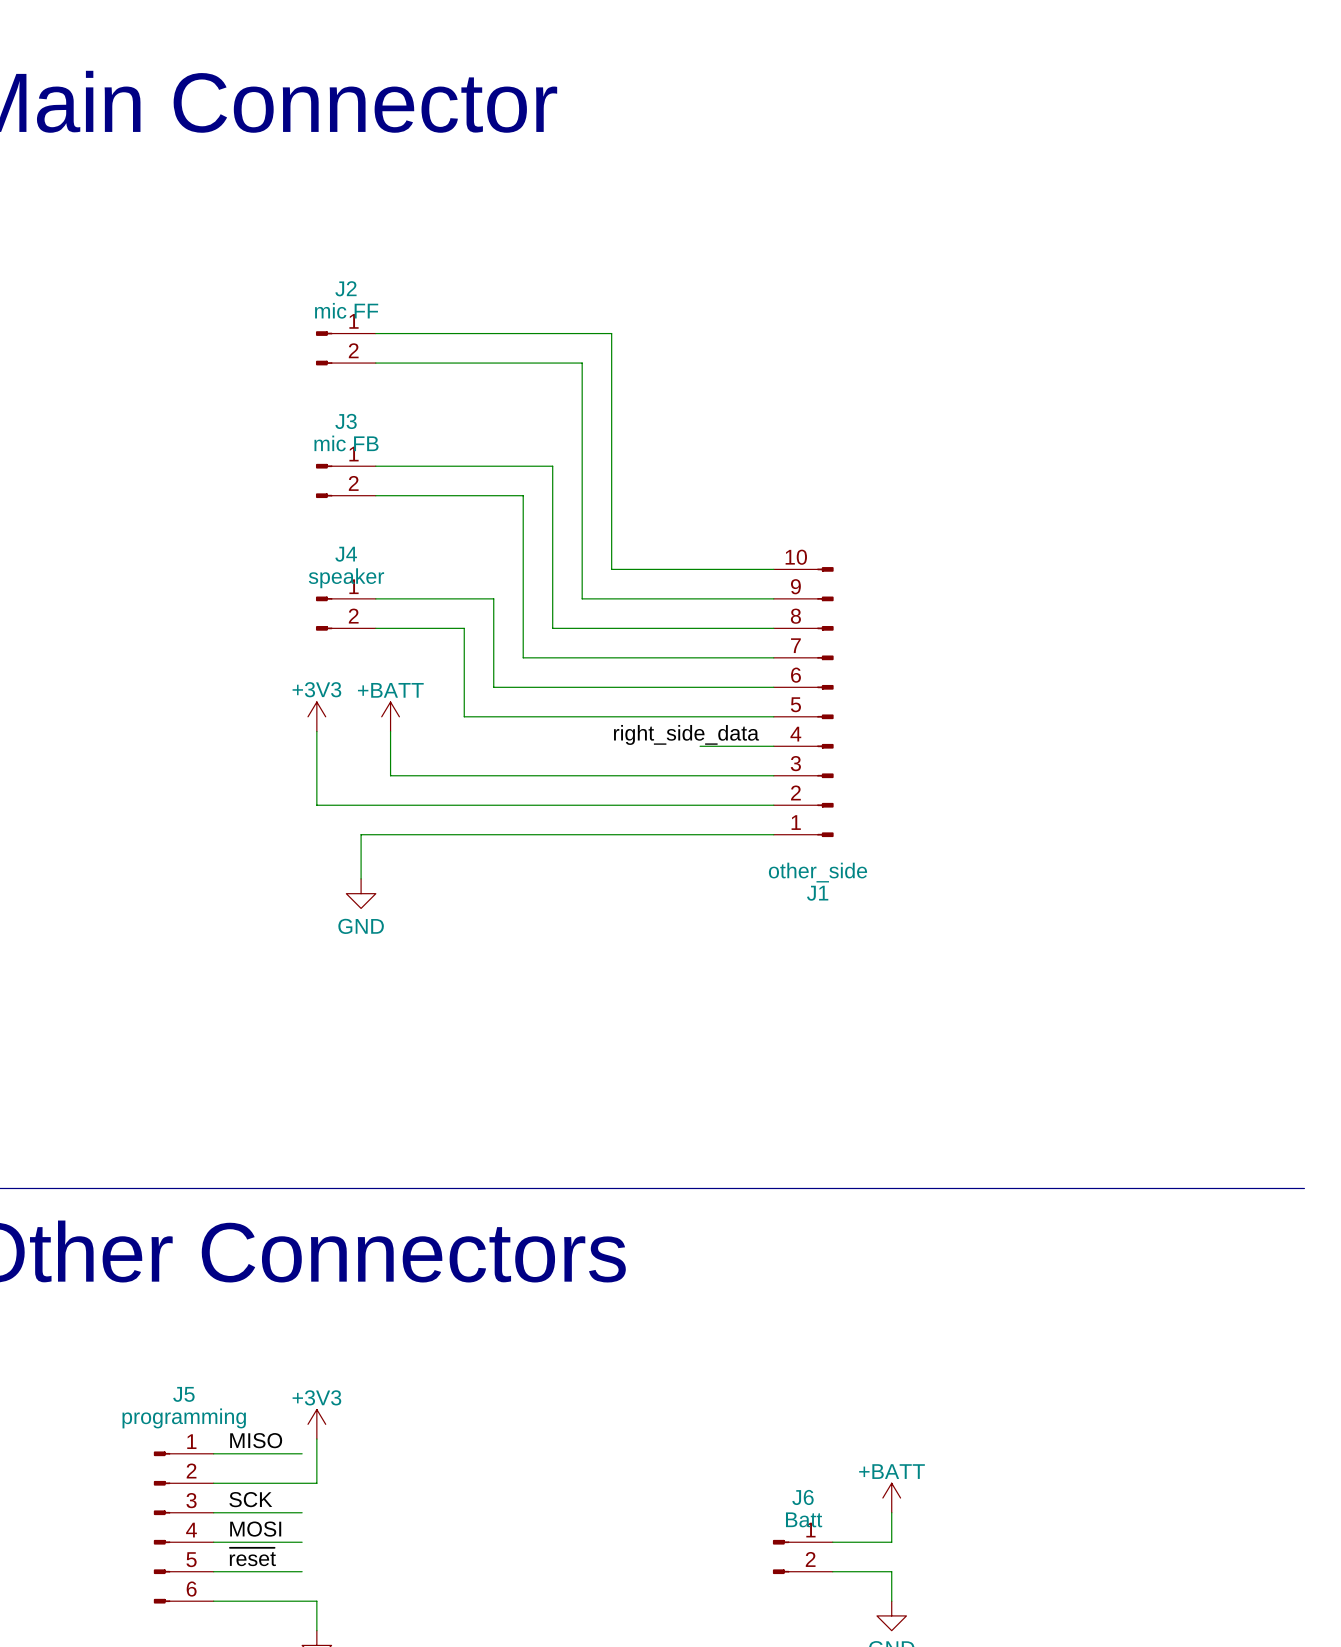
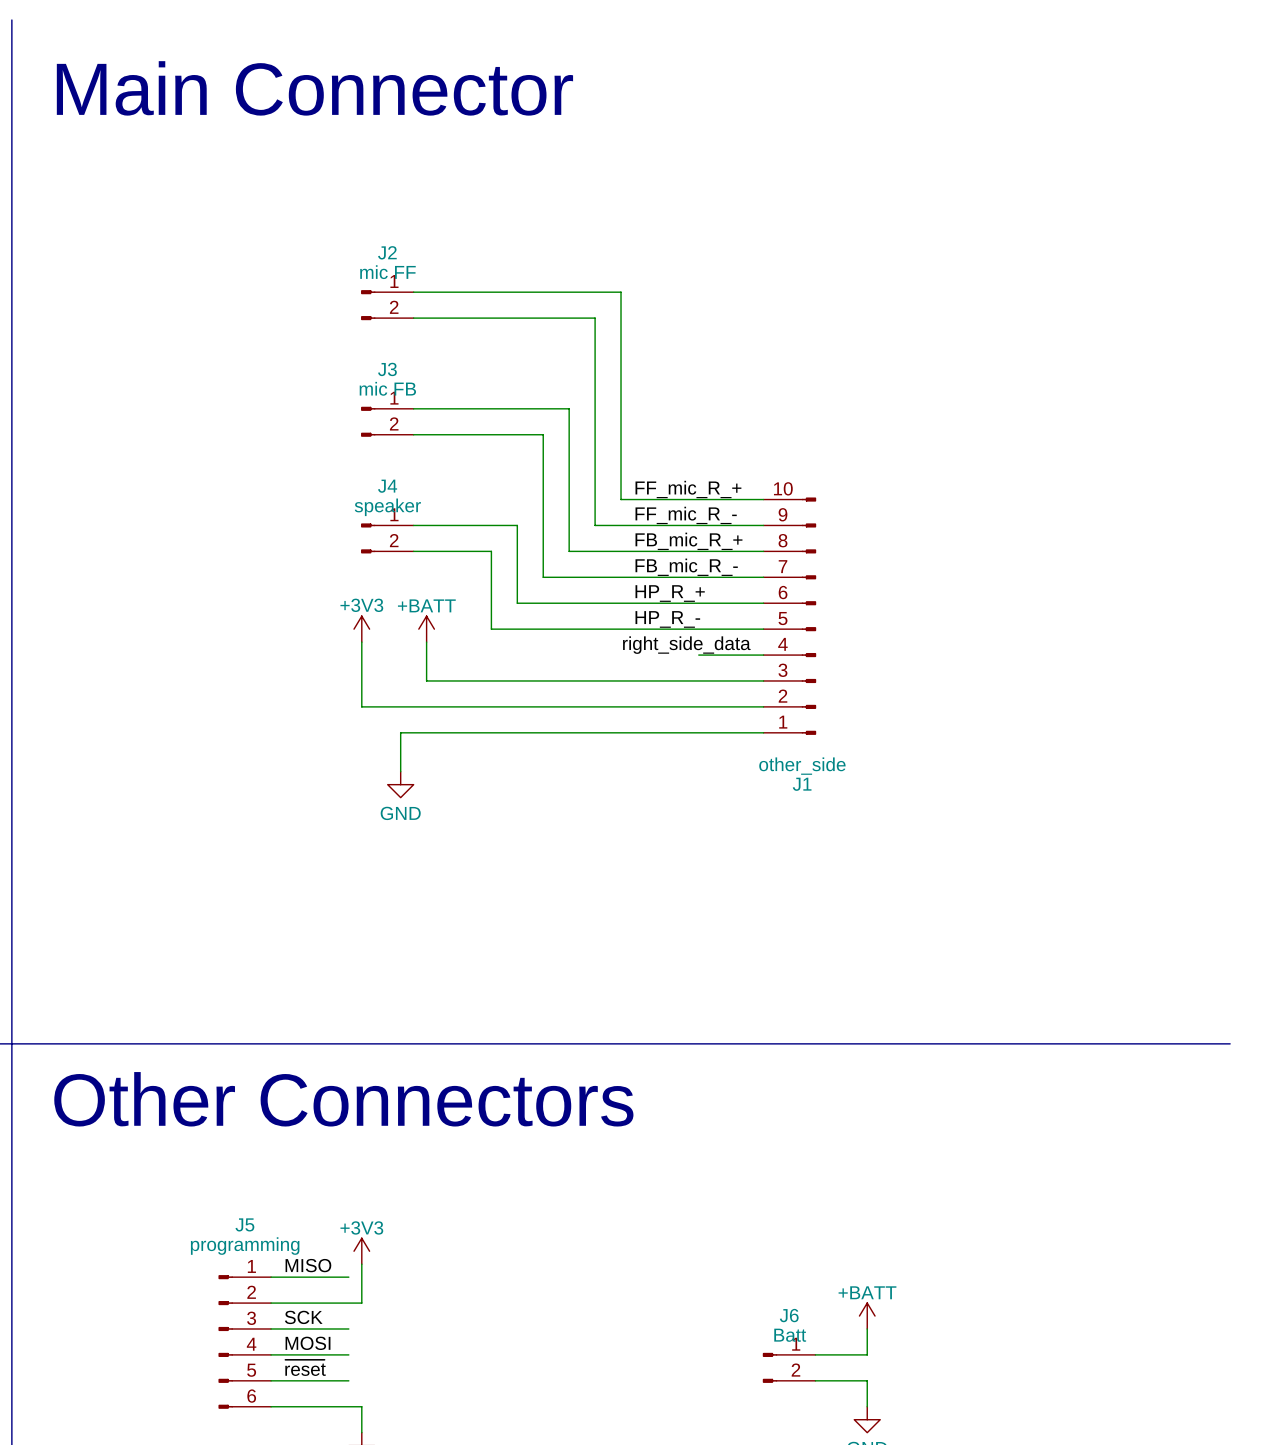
label: none -> FF_mic_R_+ (688, 489)
label: none -> FF_mic_R_- (686, 515)
label: none -> FB_mic_R_+ (688, 541)
label: none -> FB_mic_R_- (686, 567)
label: none -> HP_R_+ (670, 593)
label: none -> HP_R_- (667, 619)

